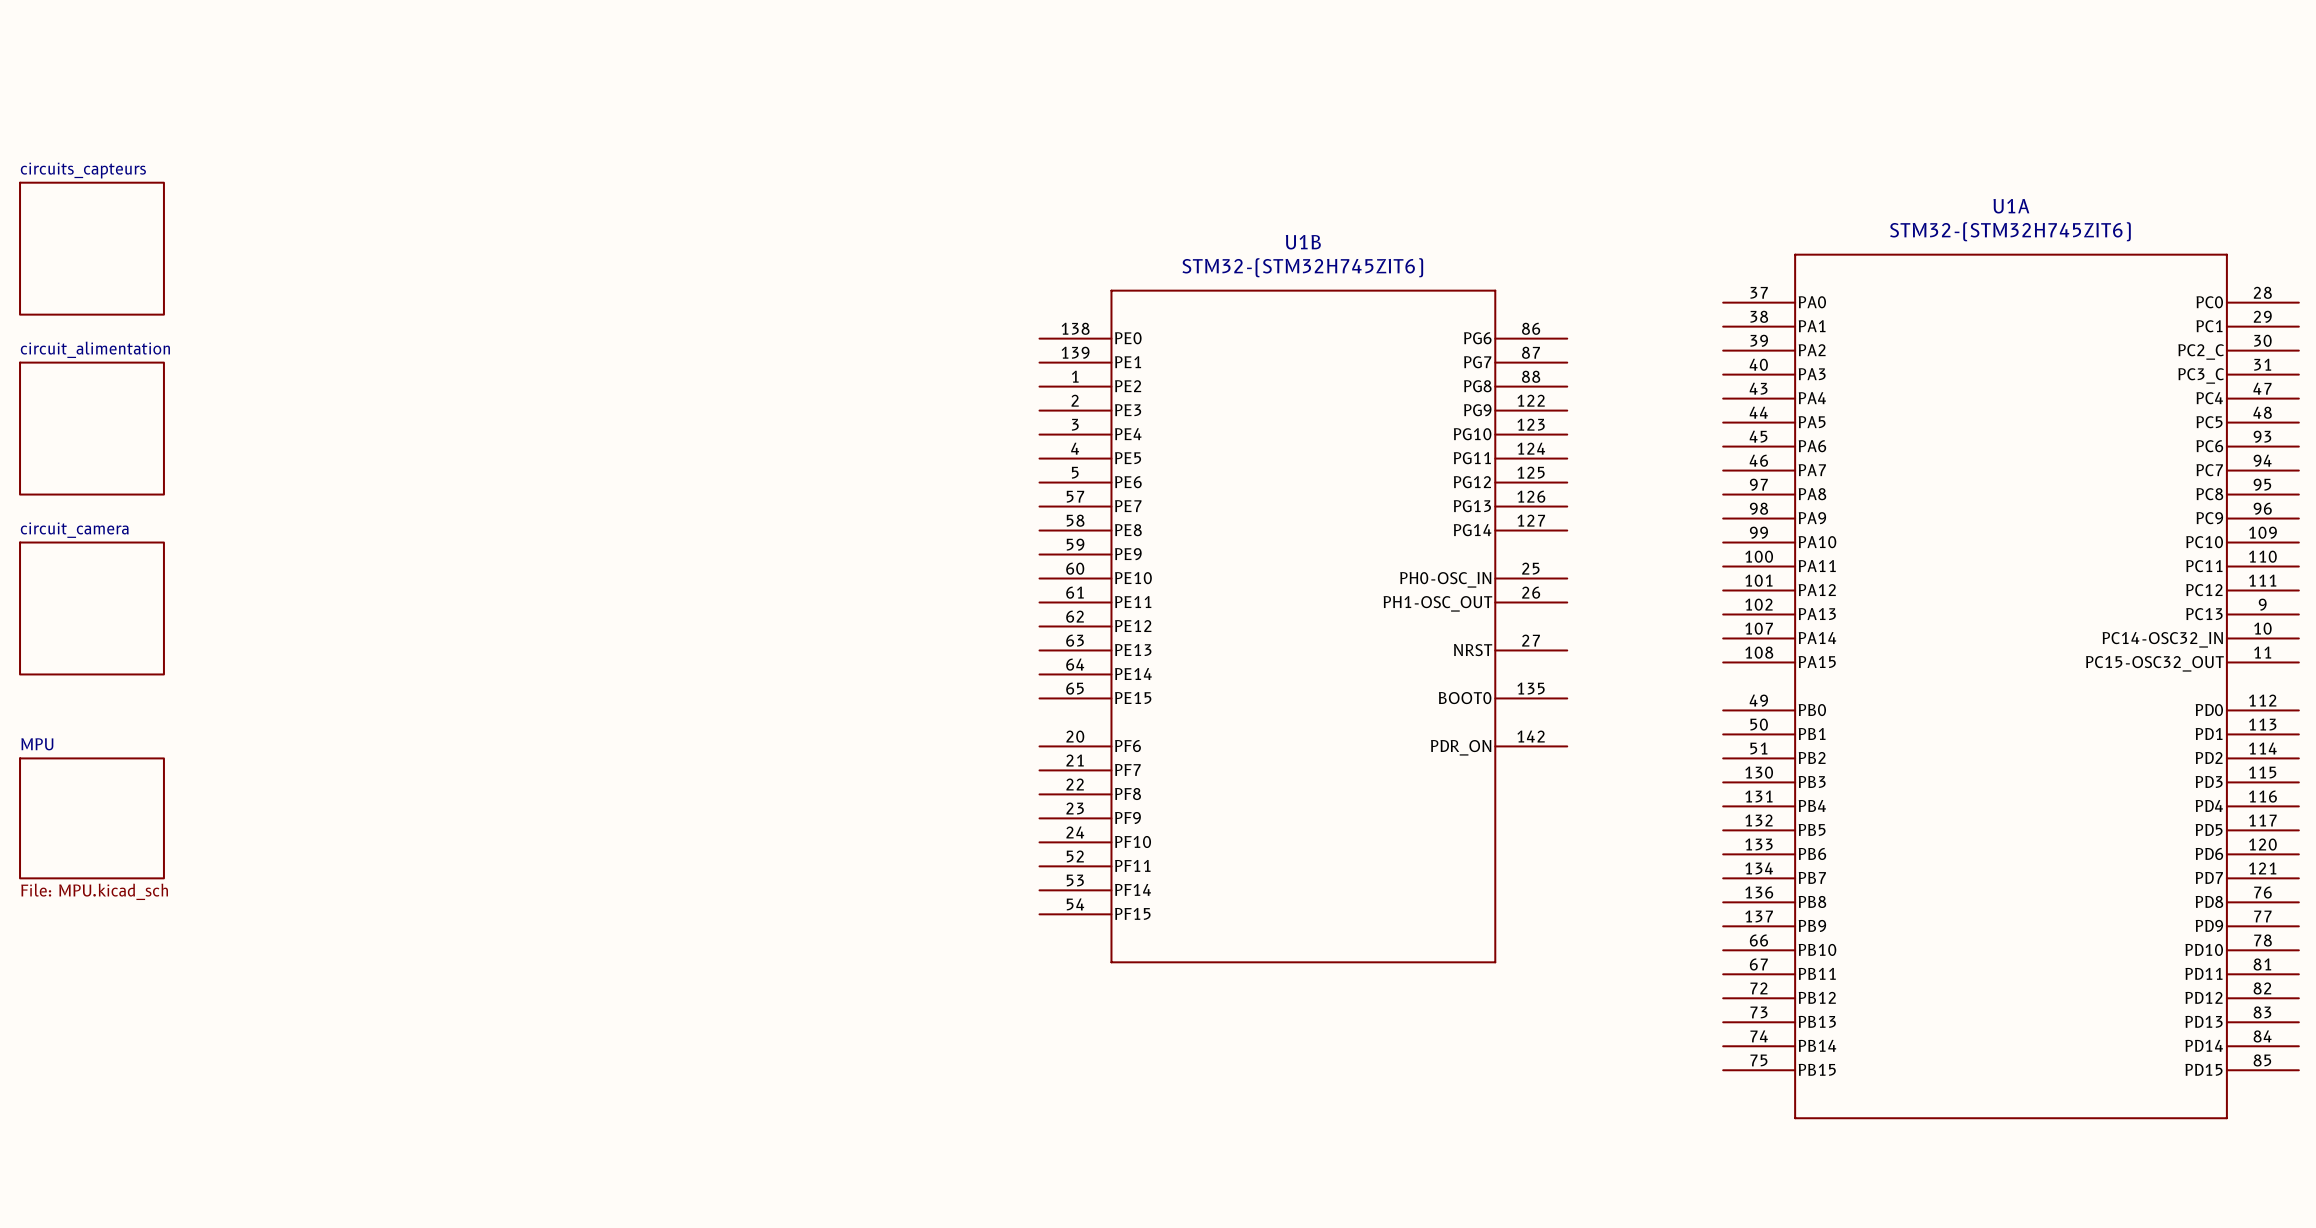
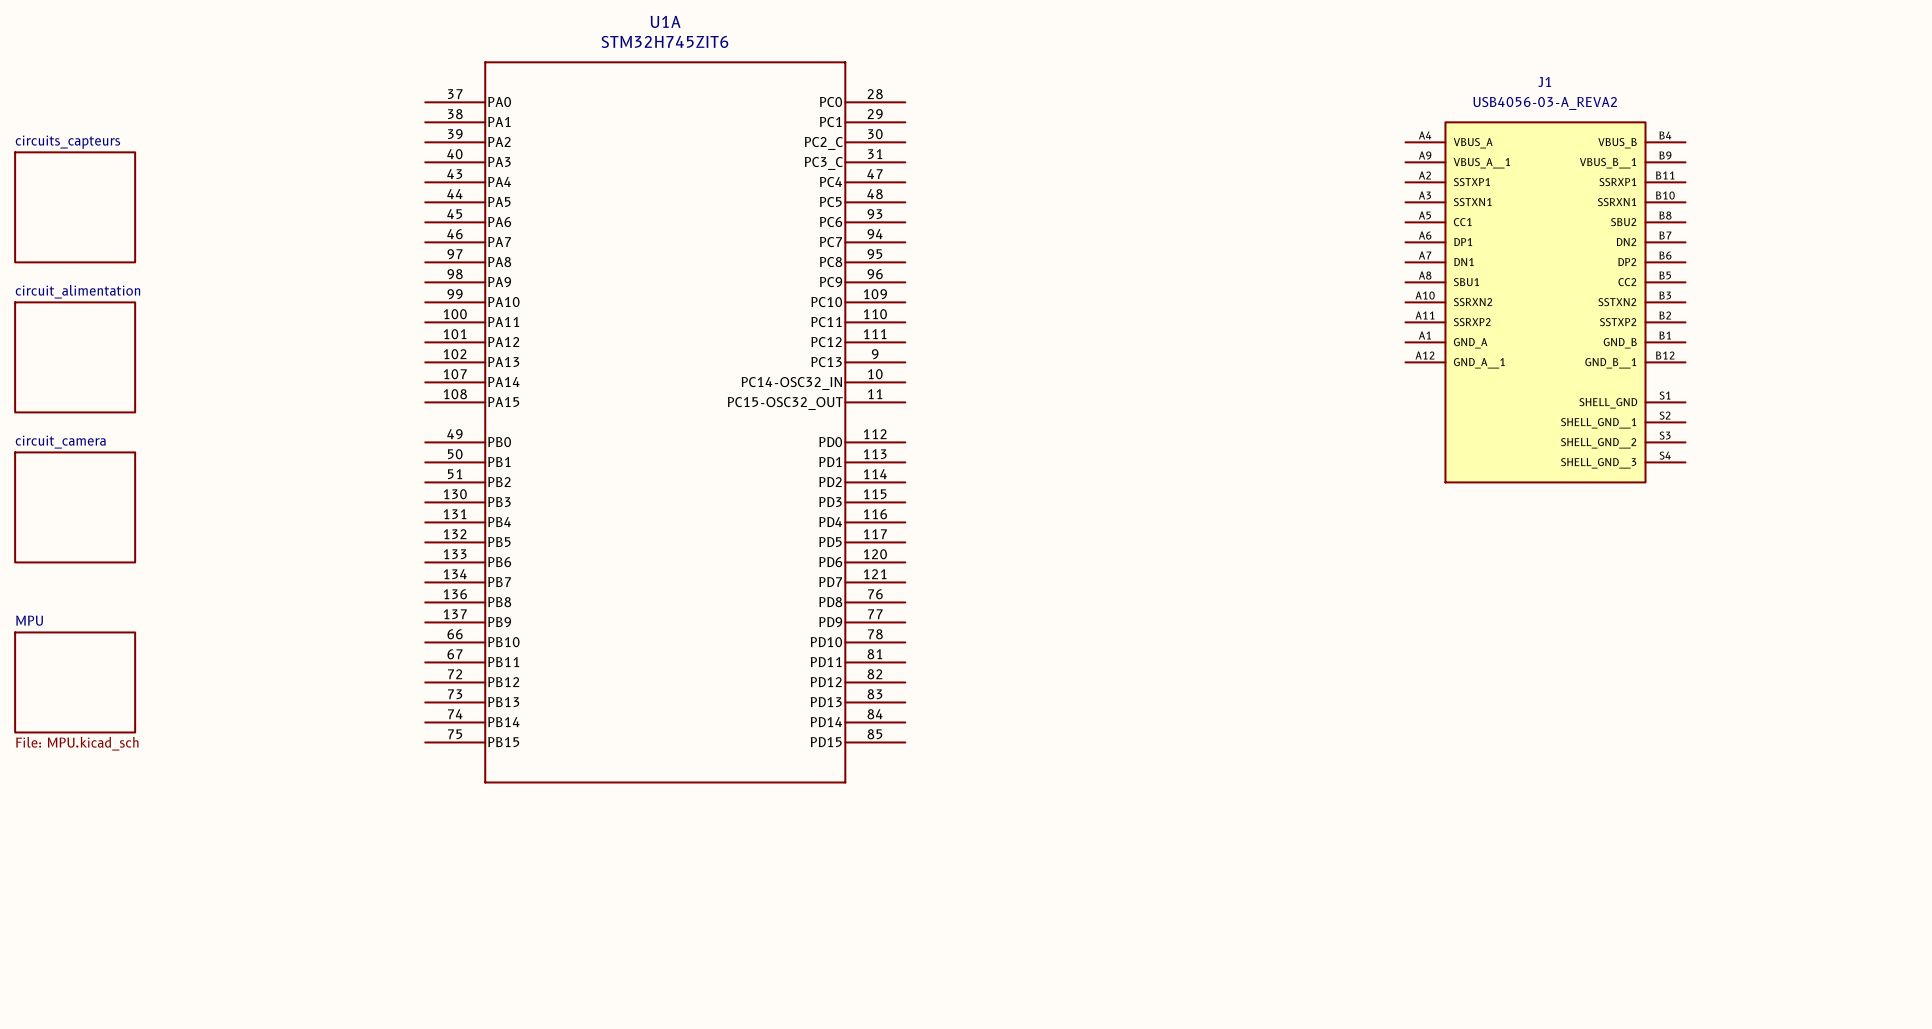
U1A value: STM32-(STM32H745ZIT6) (2010, 231) -> STM32H745ZIT6 (664, 41)
J1: none -> USB4056-03-A_REVA2 (1545, 302)
U1B: STM32-(STM32H745ZIT6) (1303, 626) -> none
U1A position: (2011, 686) -> (665, 422)

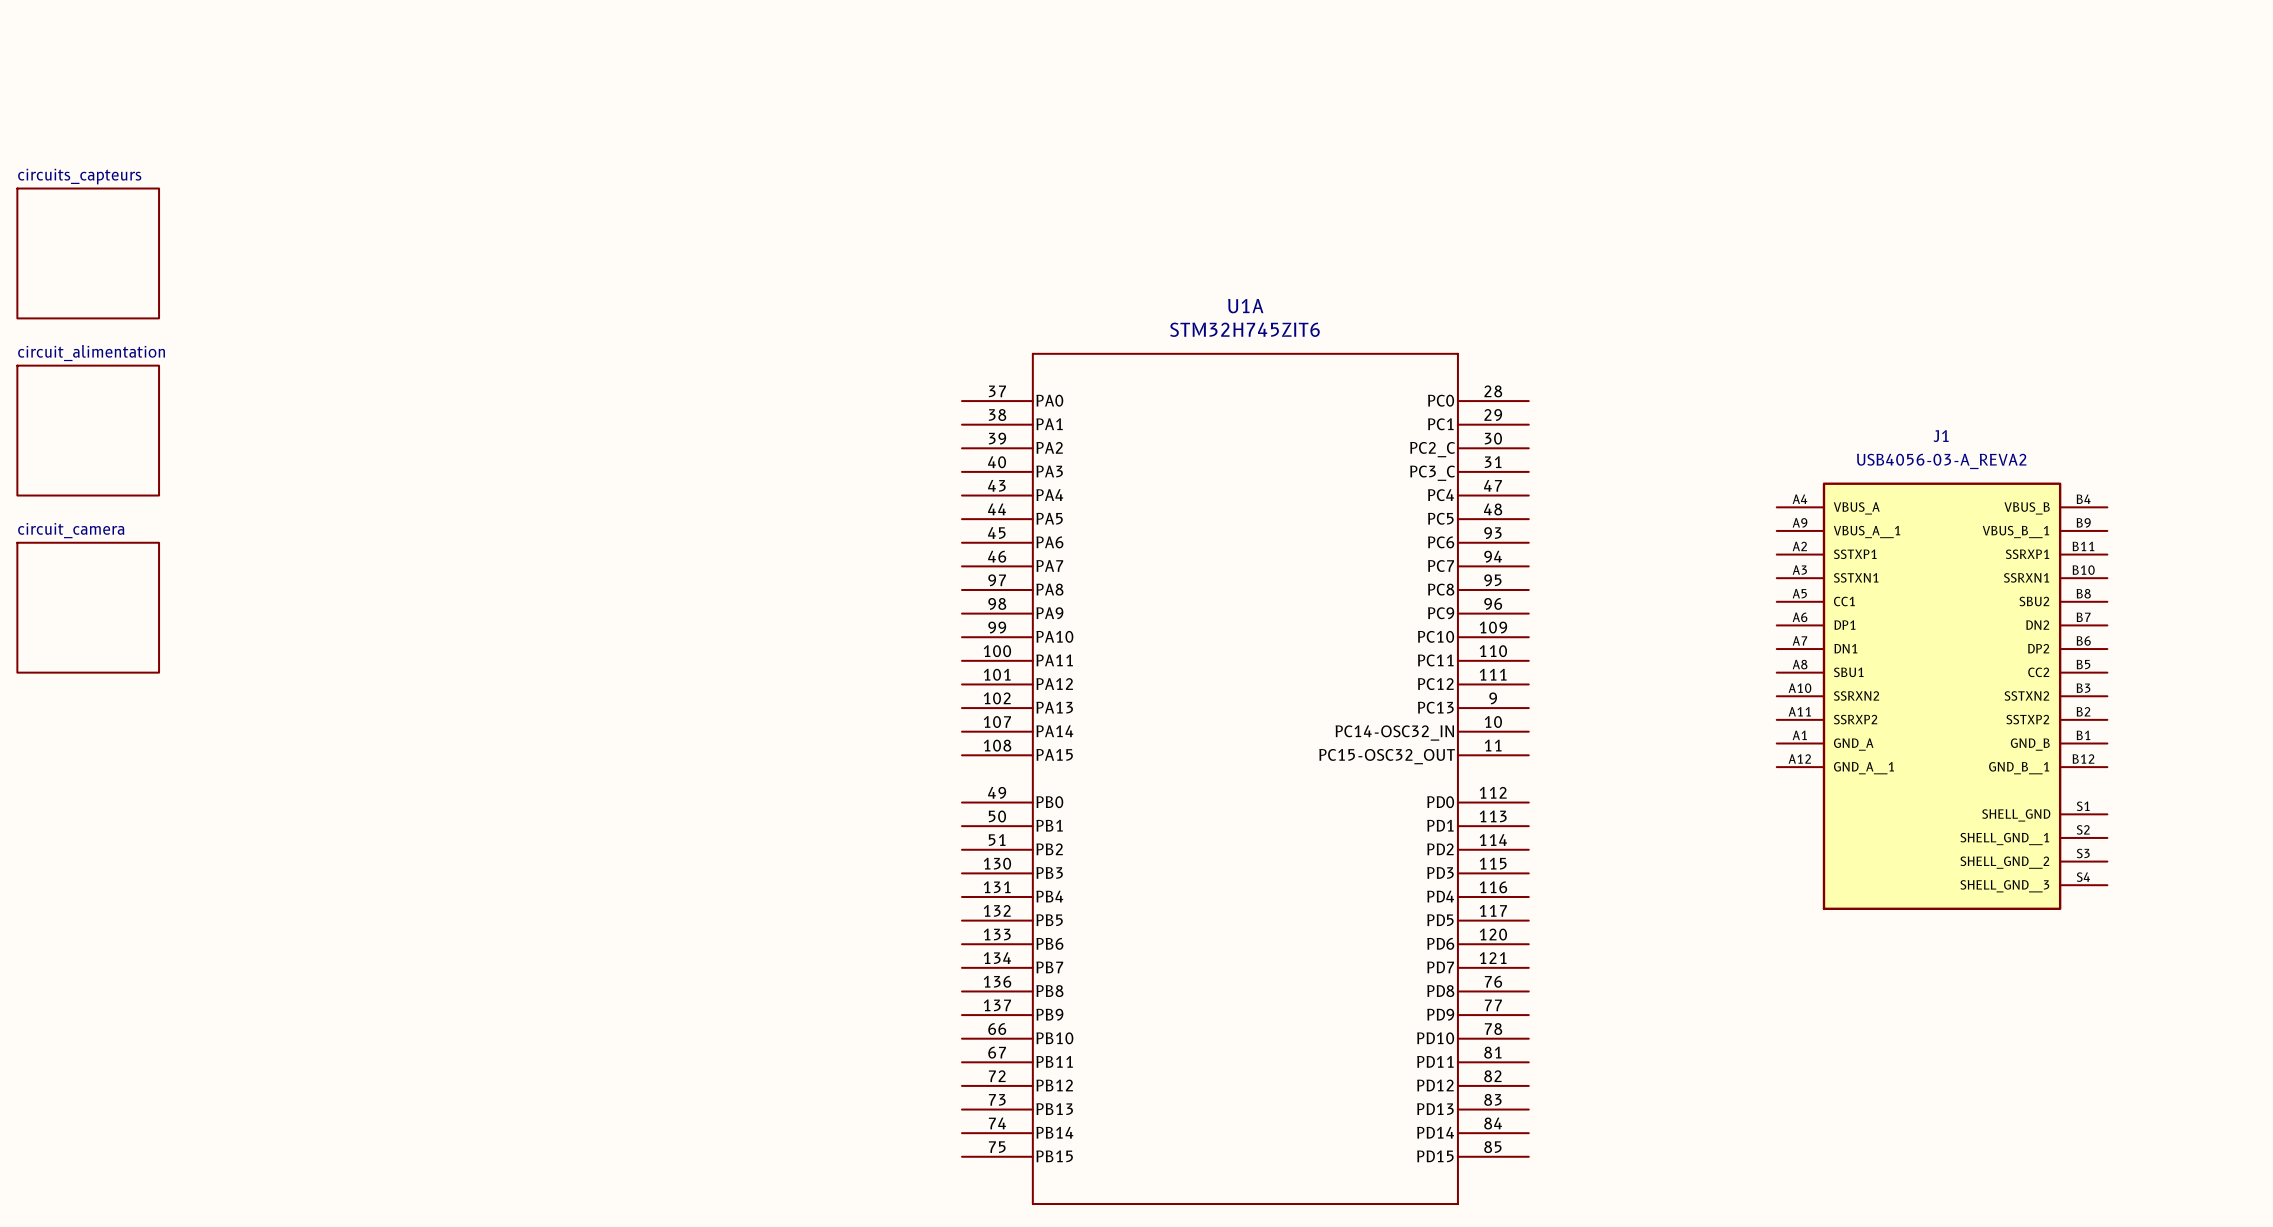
J1 position: (1545, 302) -> (1942, 696)
U1A position: (665, 422) -> (1245, 778)
sheet MPU: File: MPU.kicad_sch (75, 682) -> none

